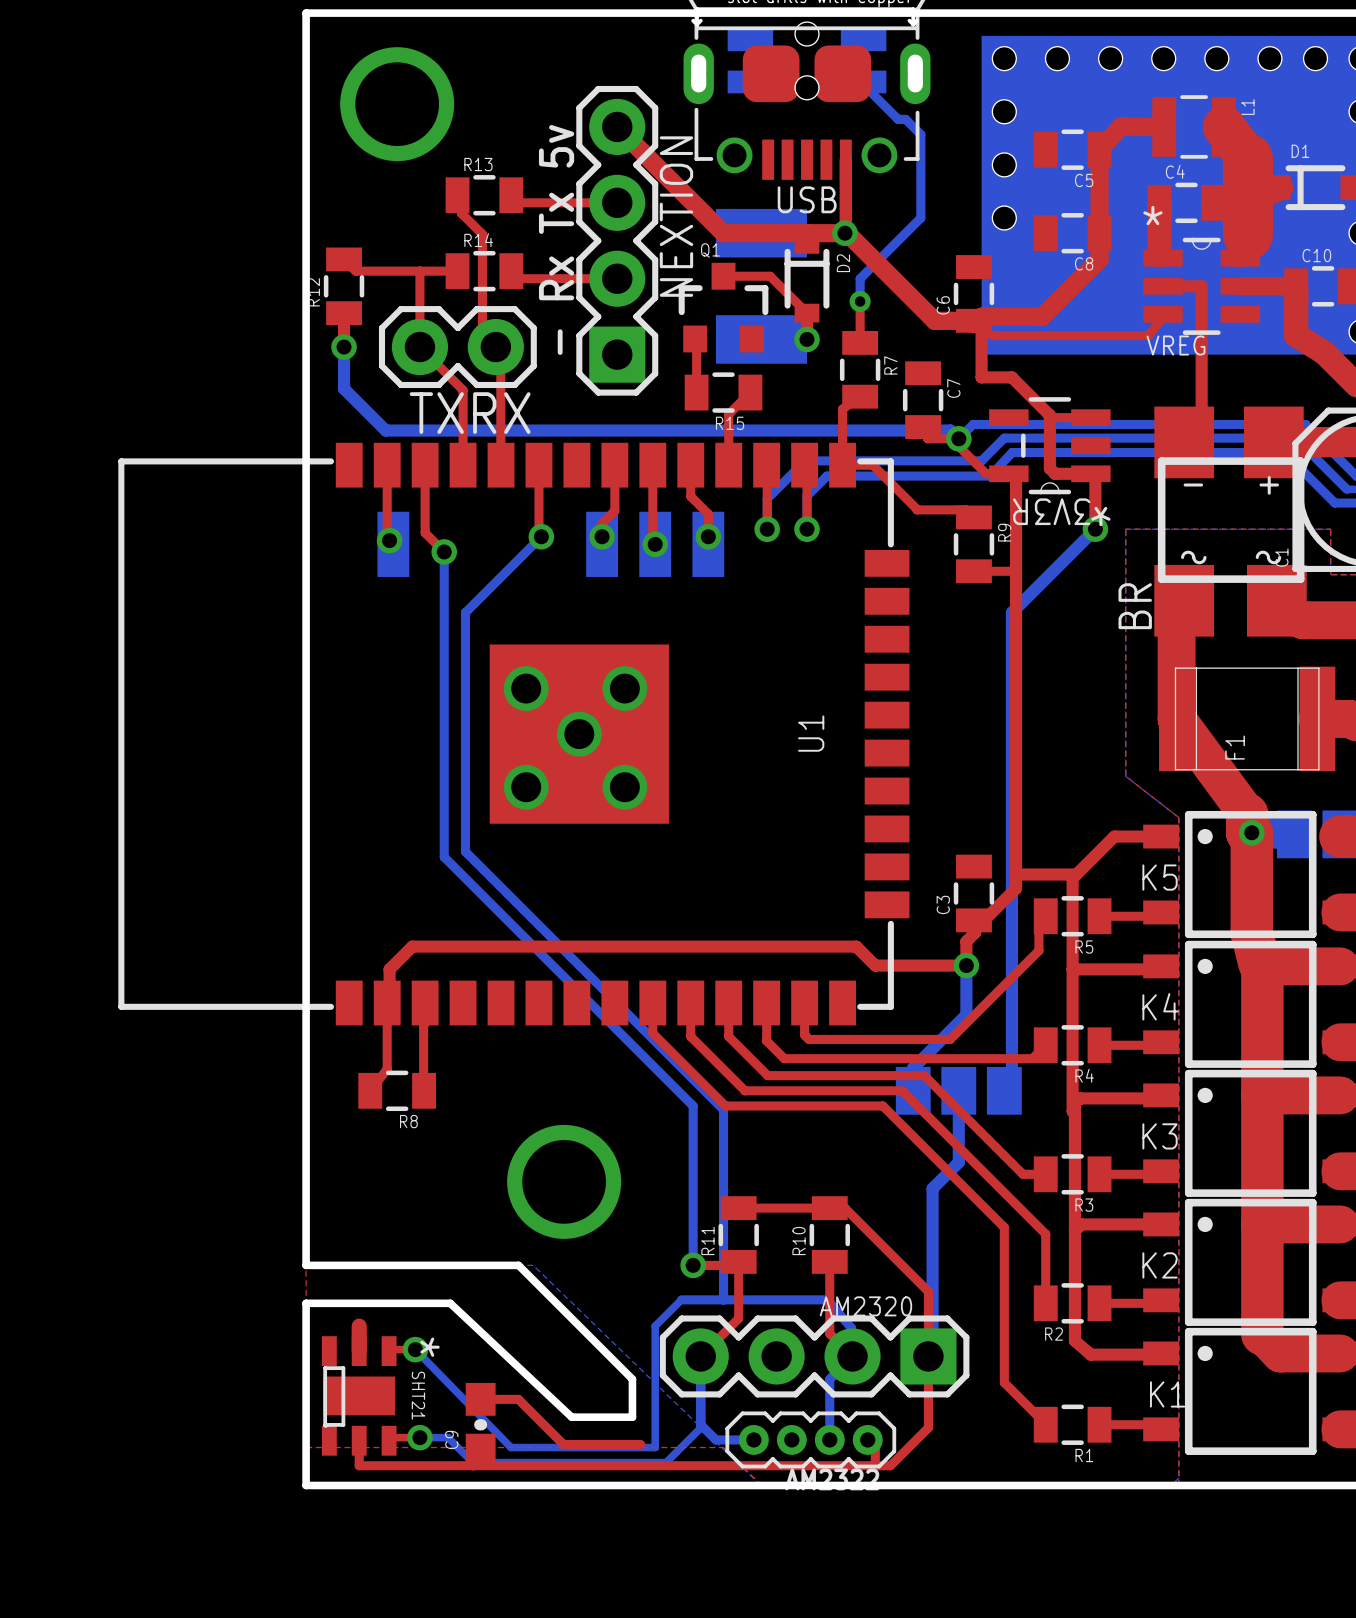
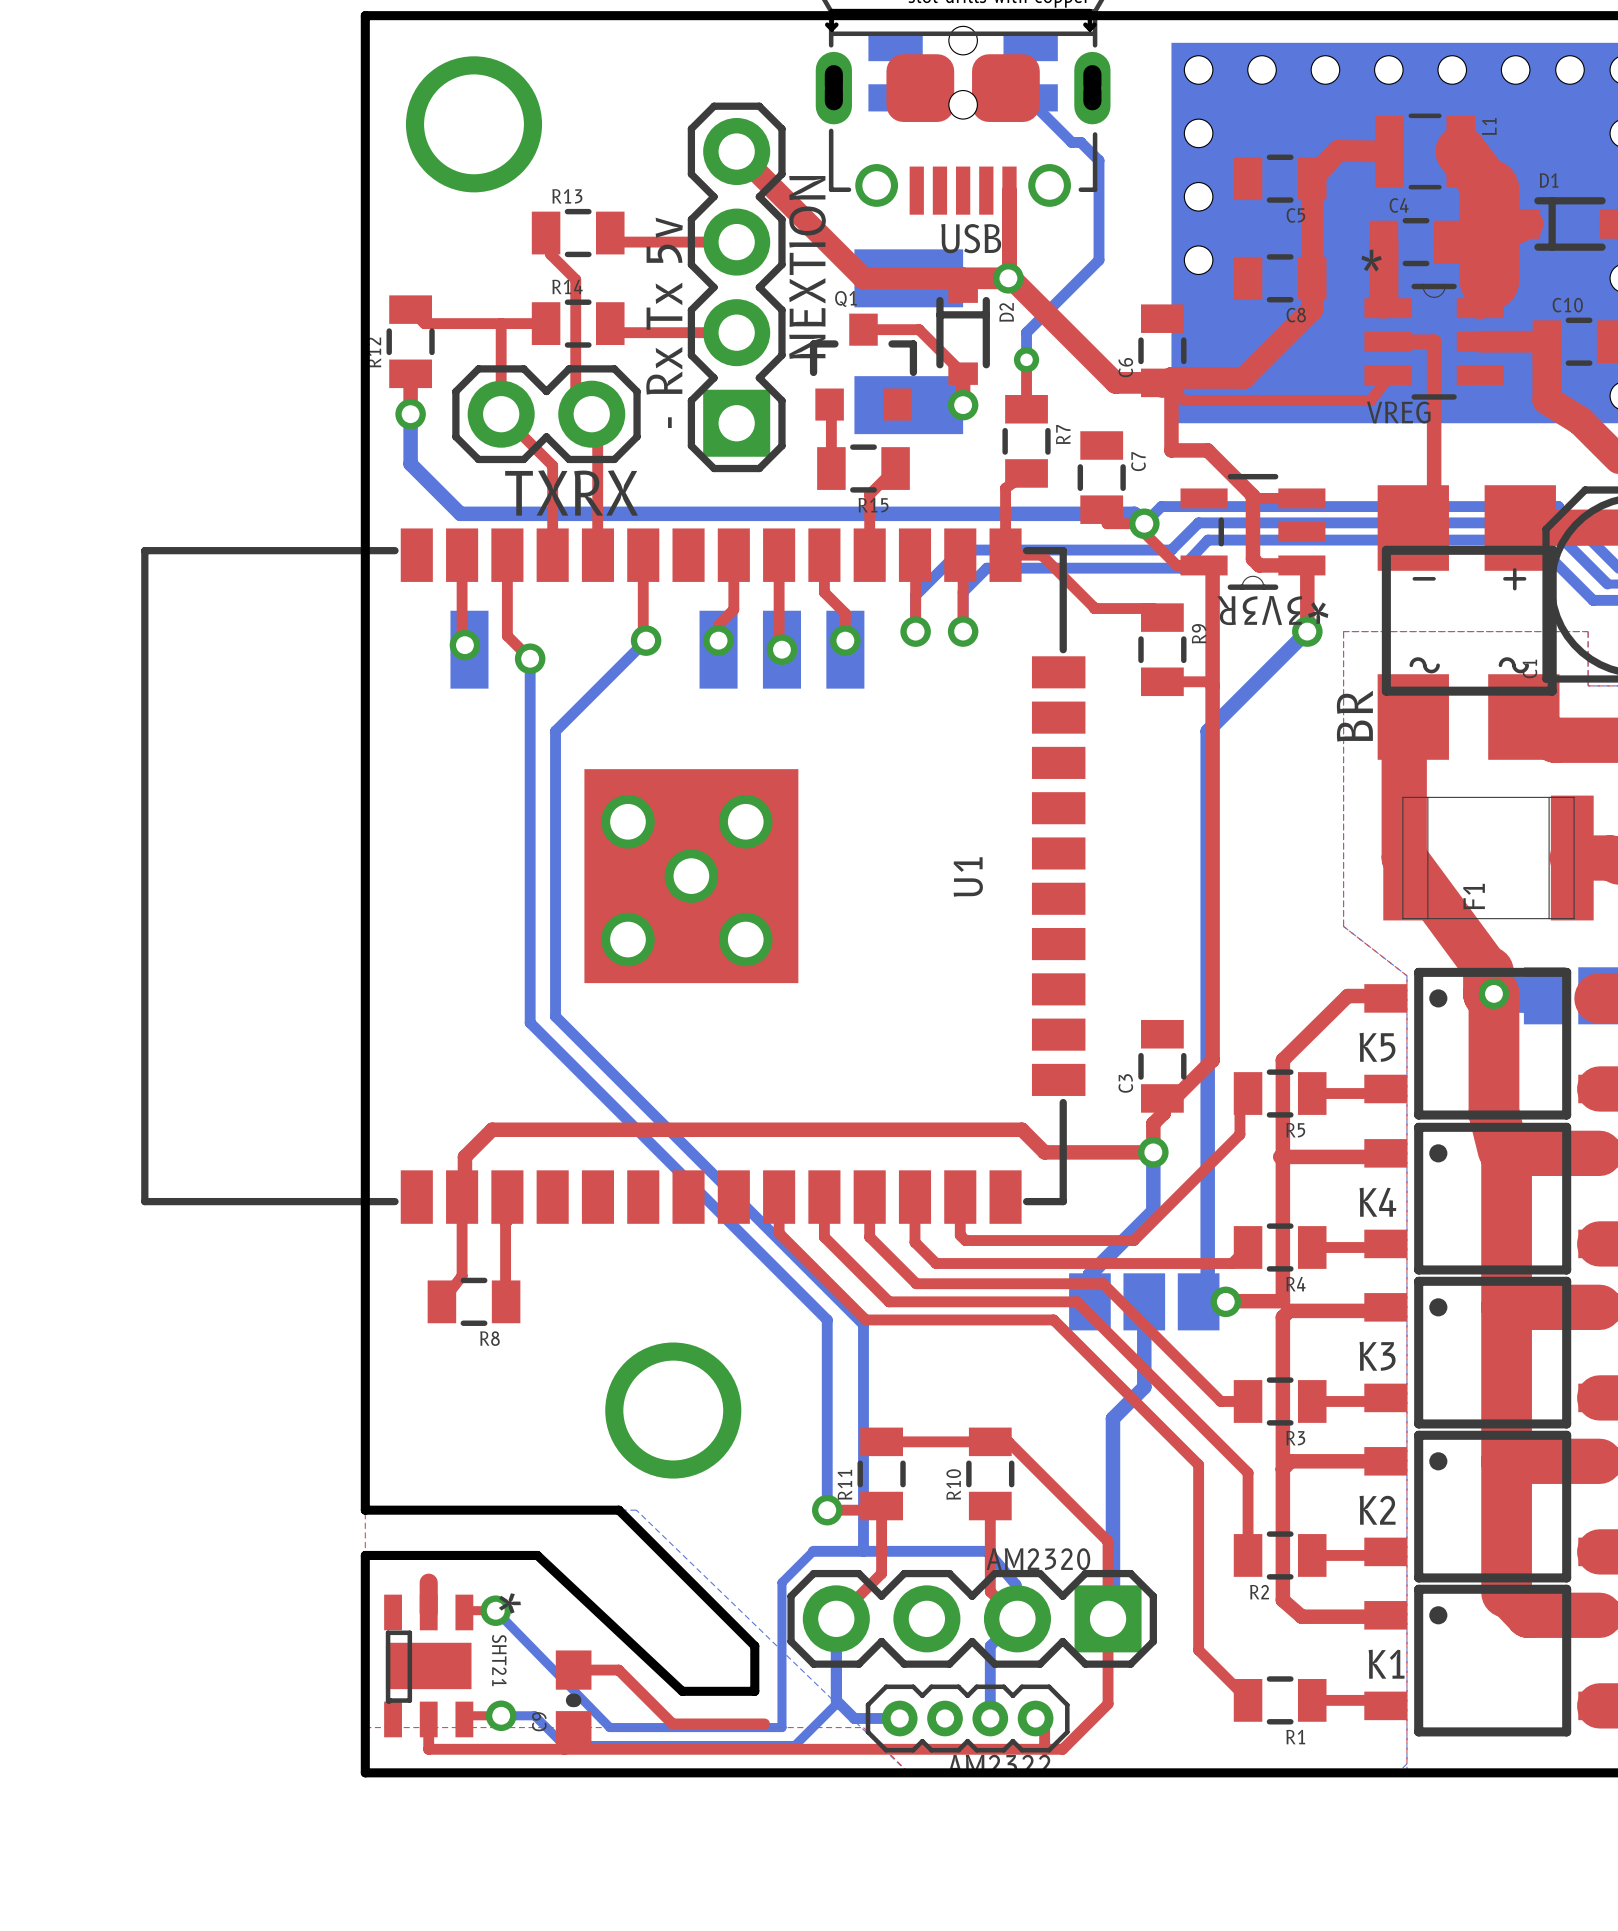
top track: (1161, 836) (1114, 836) (1072, 878) (1072, 1111) (1074, 1113) -> (1385, 998) (1383, 996) (1347, 996) (1282, 1060) (1282, 1301) (1225, 1301)
top track: (1016, 874) (1076, 874) -> none
via: none -> (1225, 1301)

